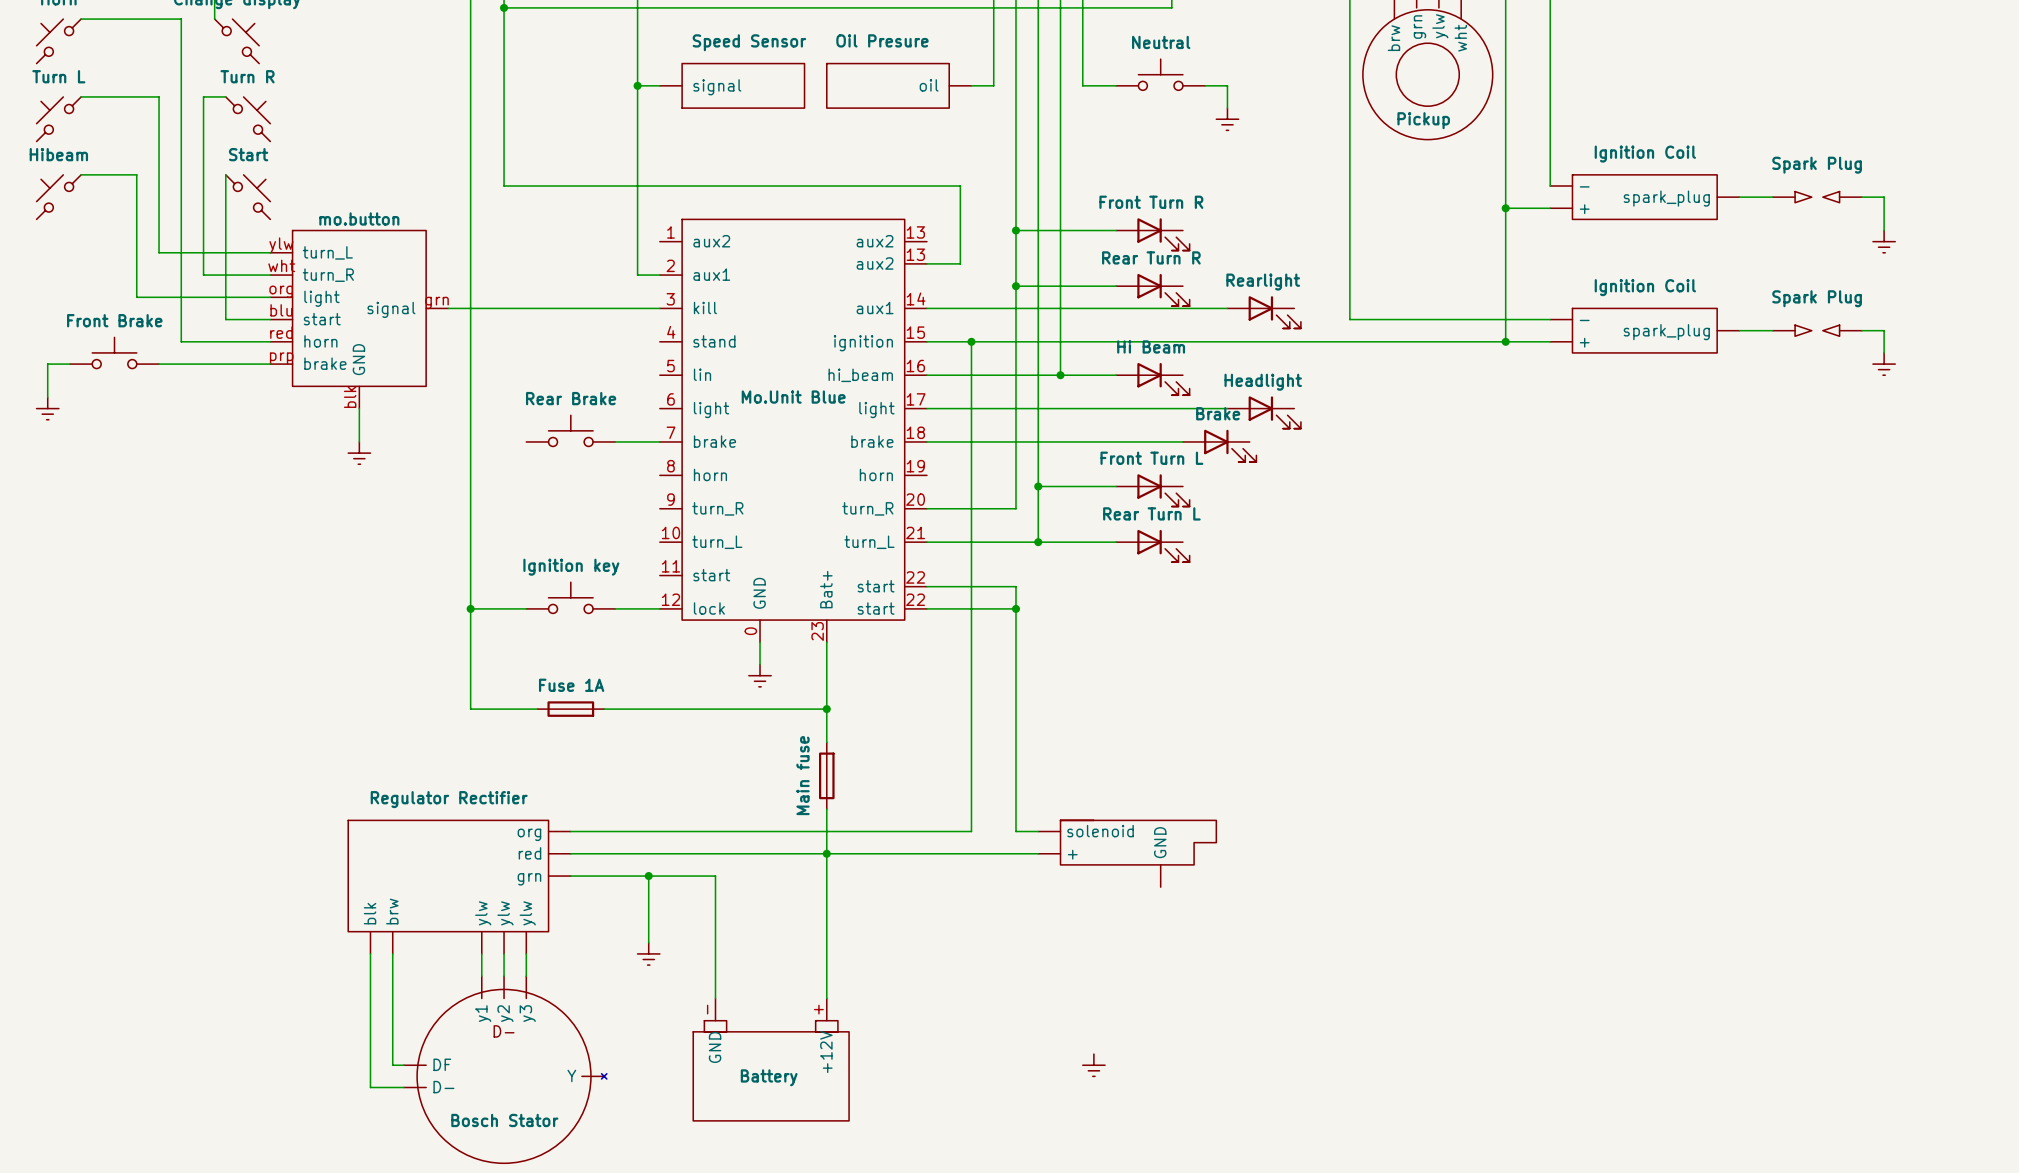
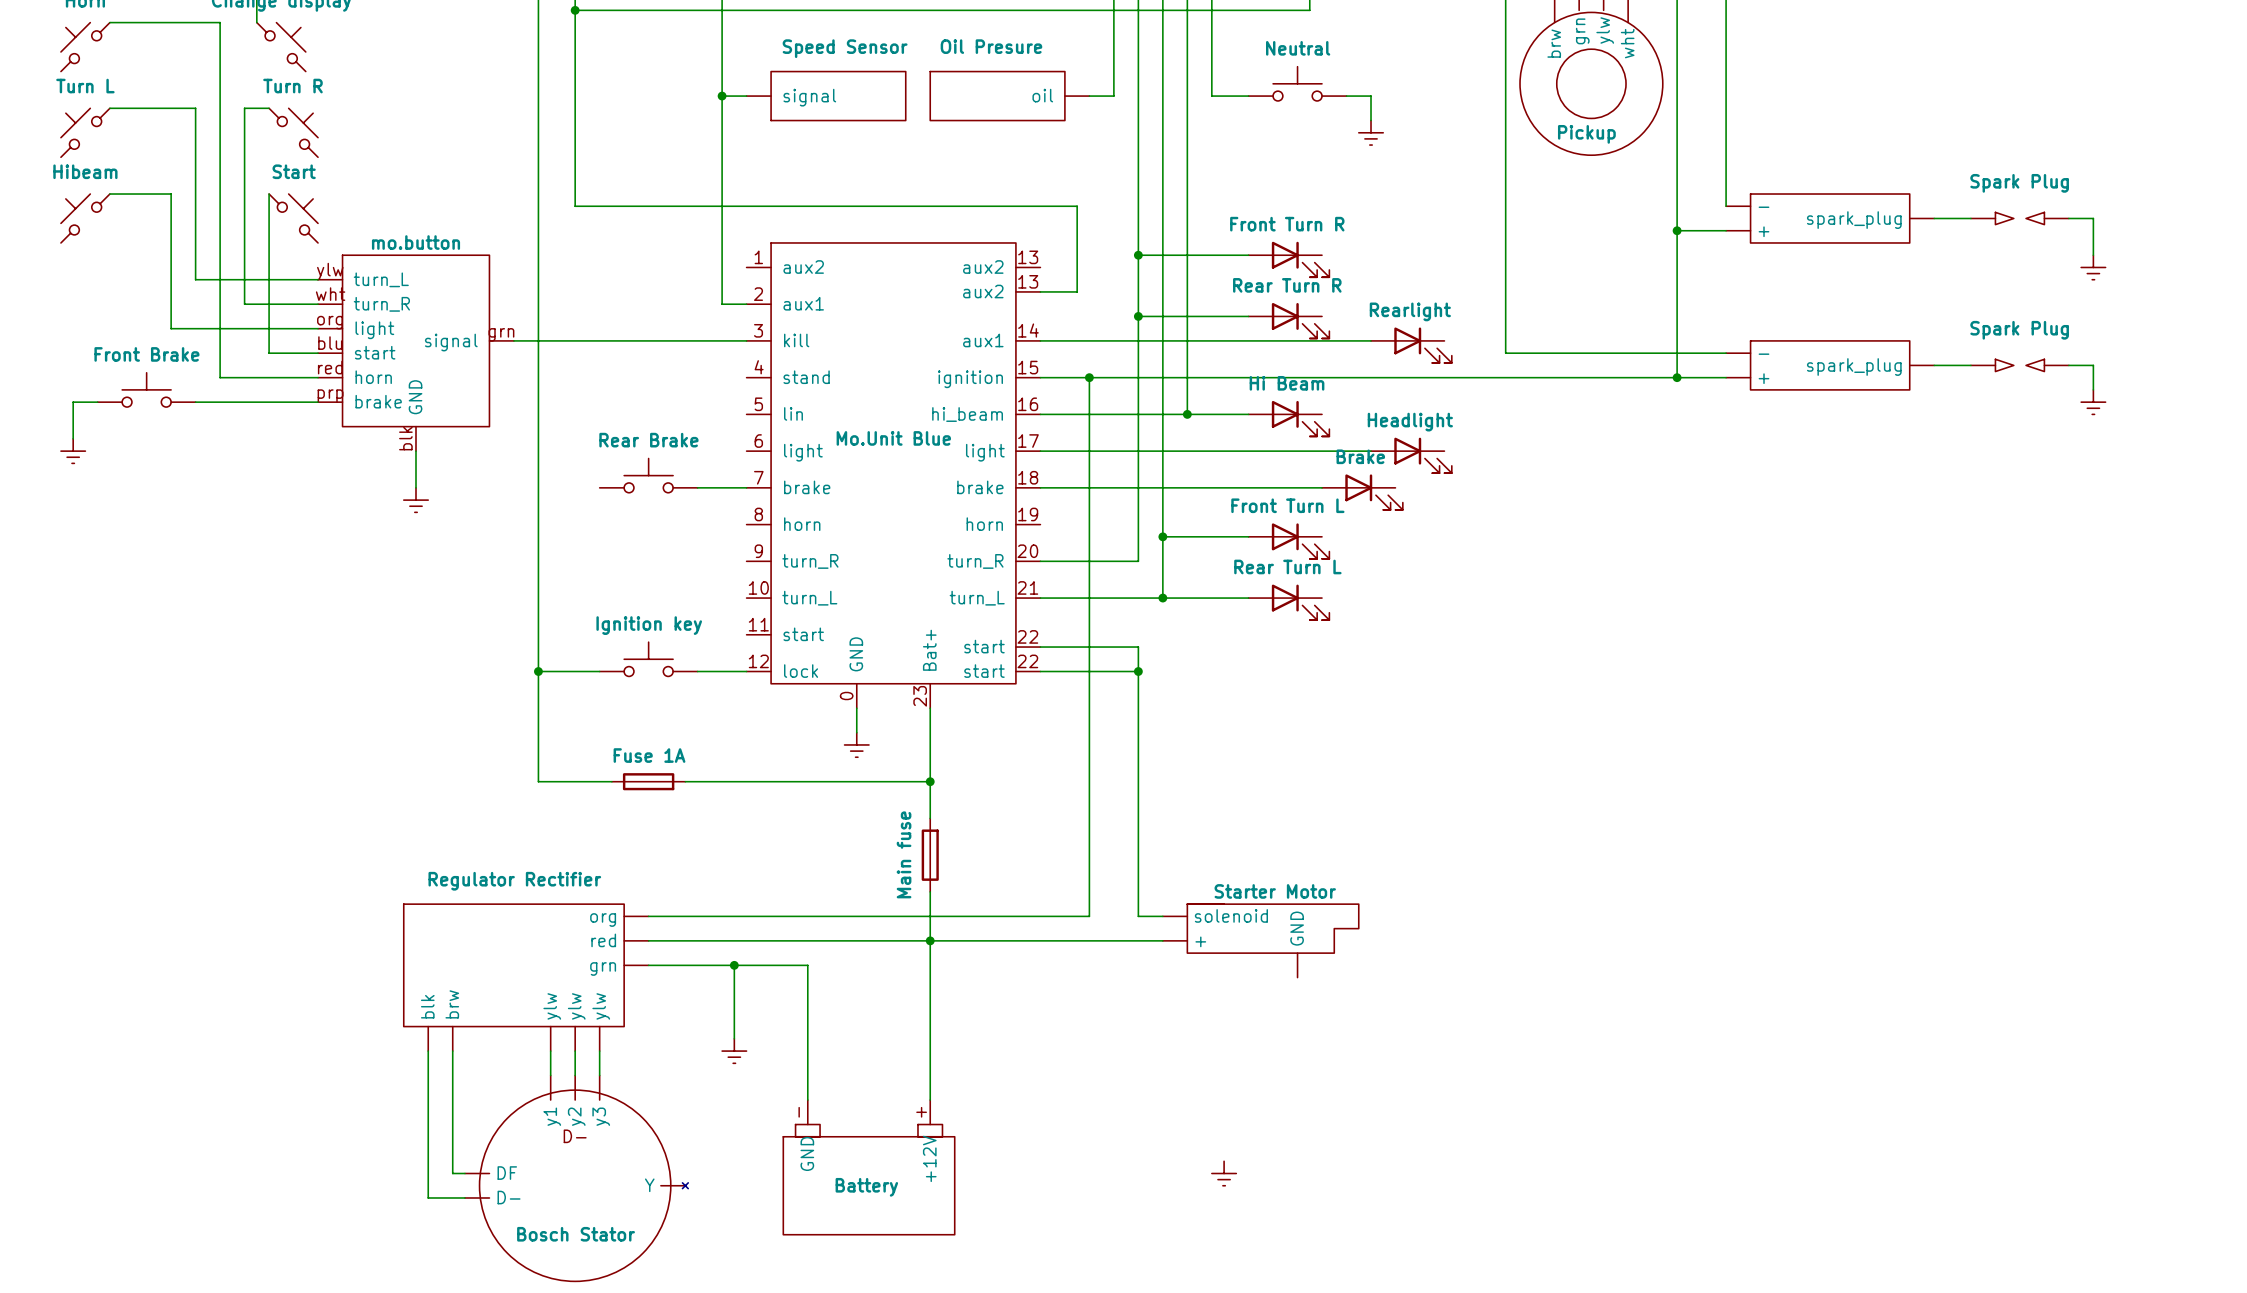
part value: Ignition Coil (1645, 154) -> none
part value: Ignition Coil (1645, 287) -> none
part value: none -> Starter Motor (1275, 891)

